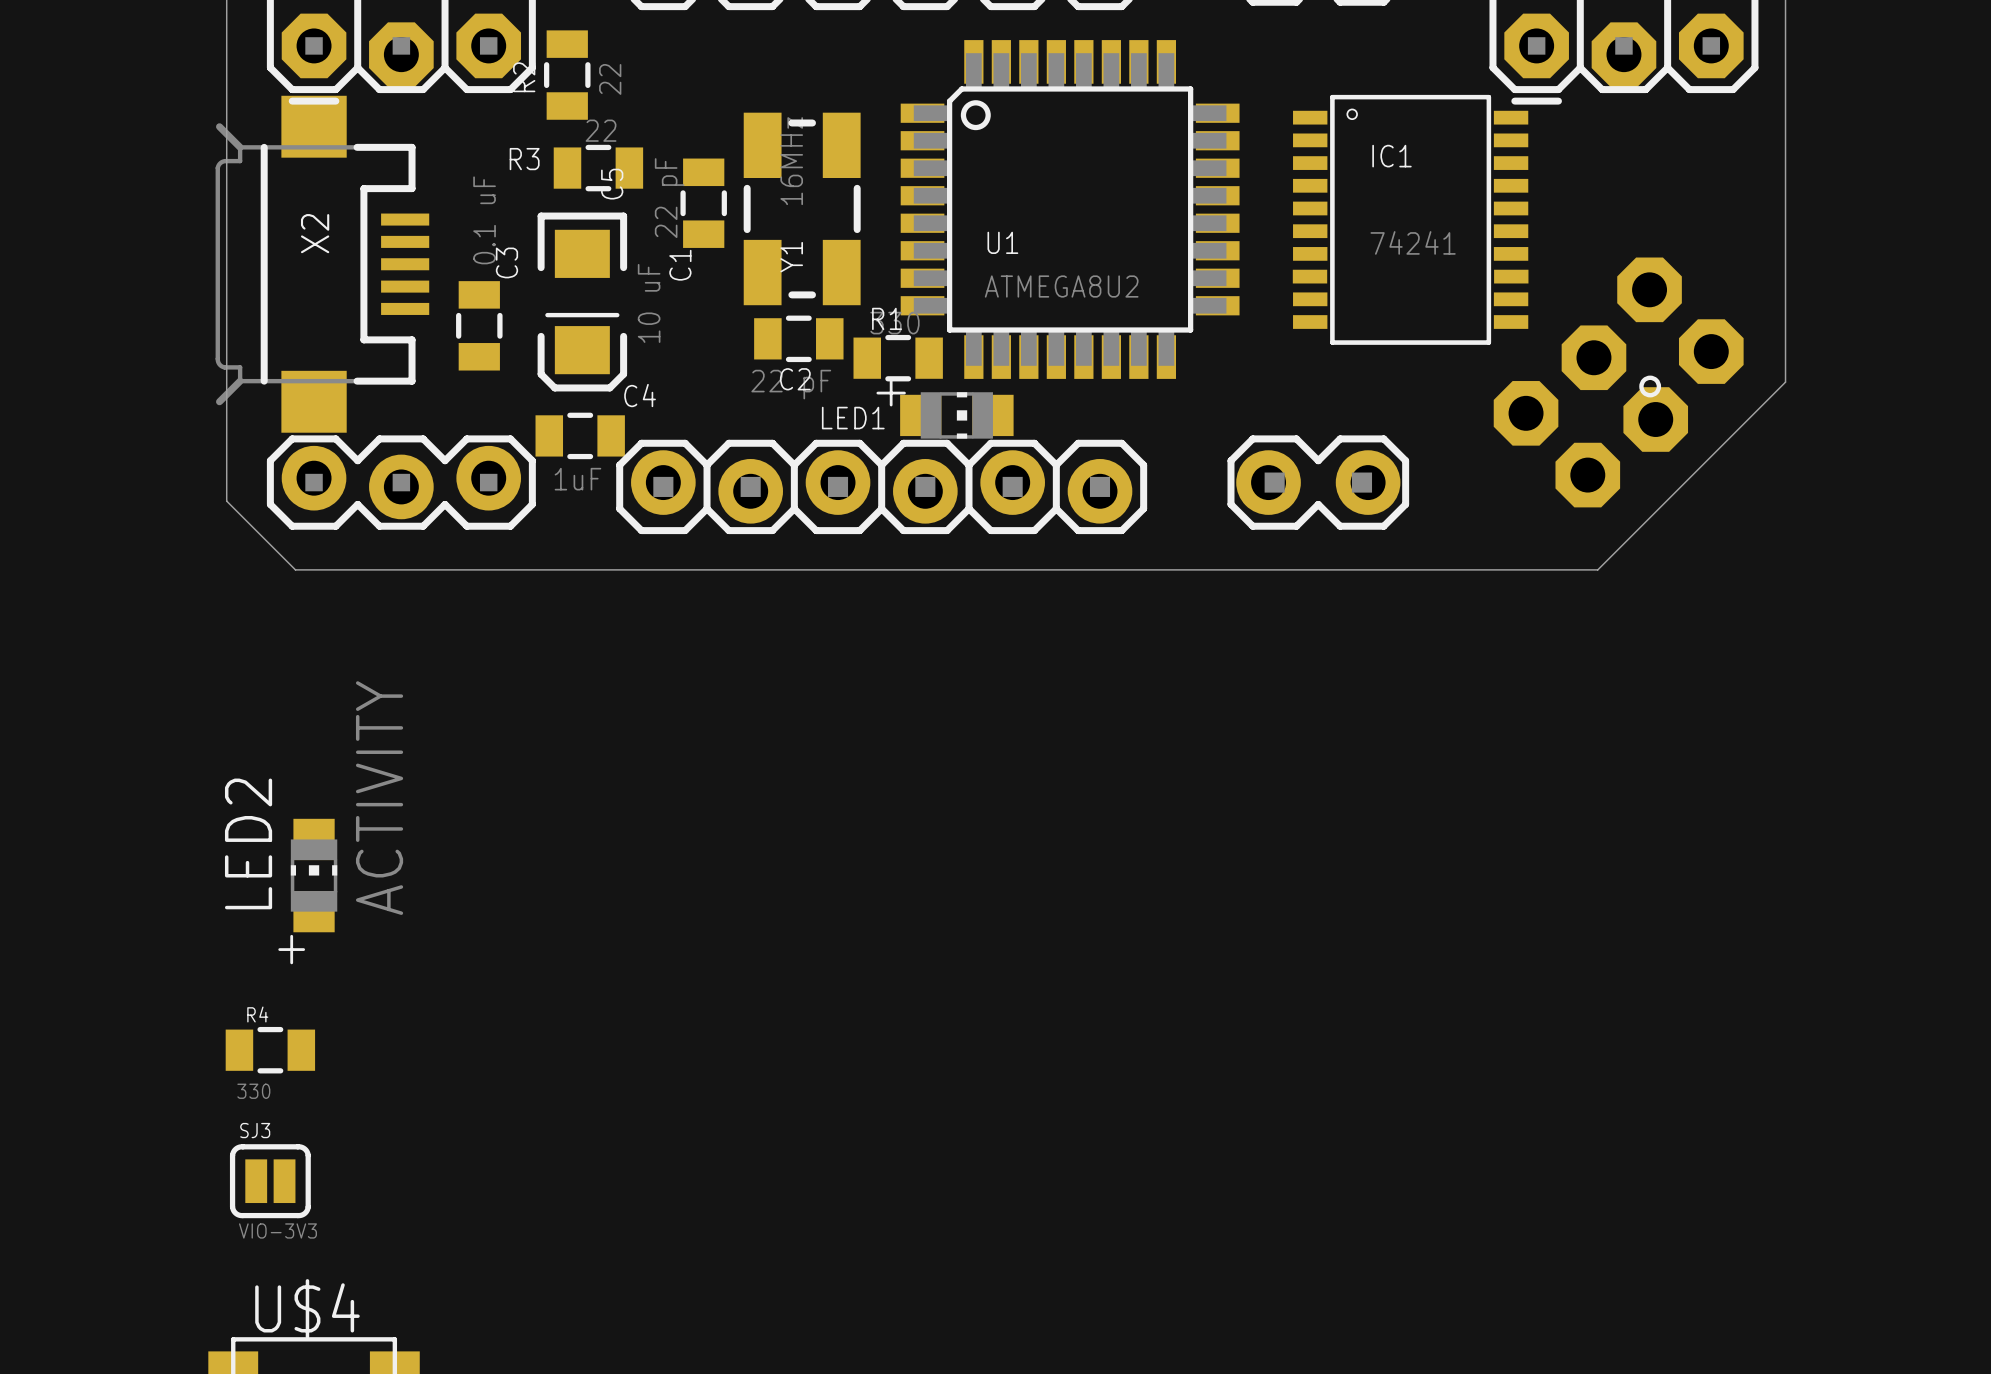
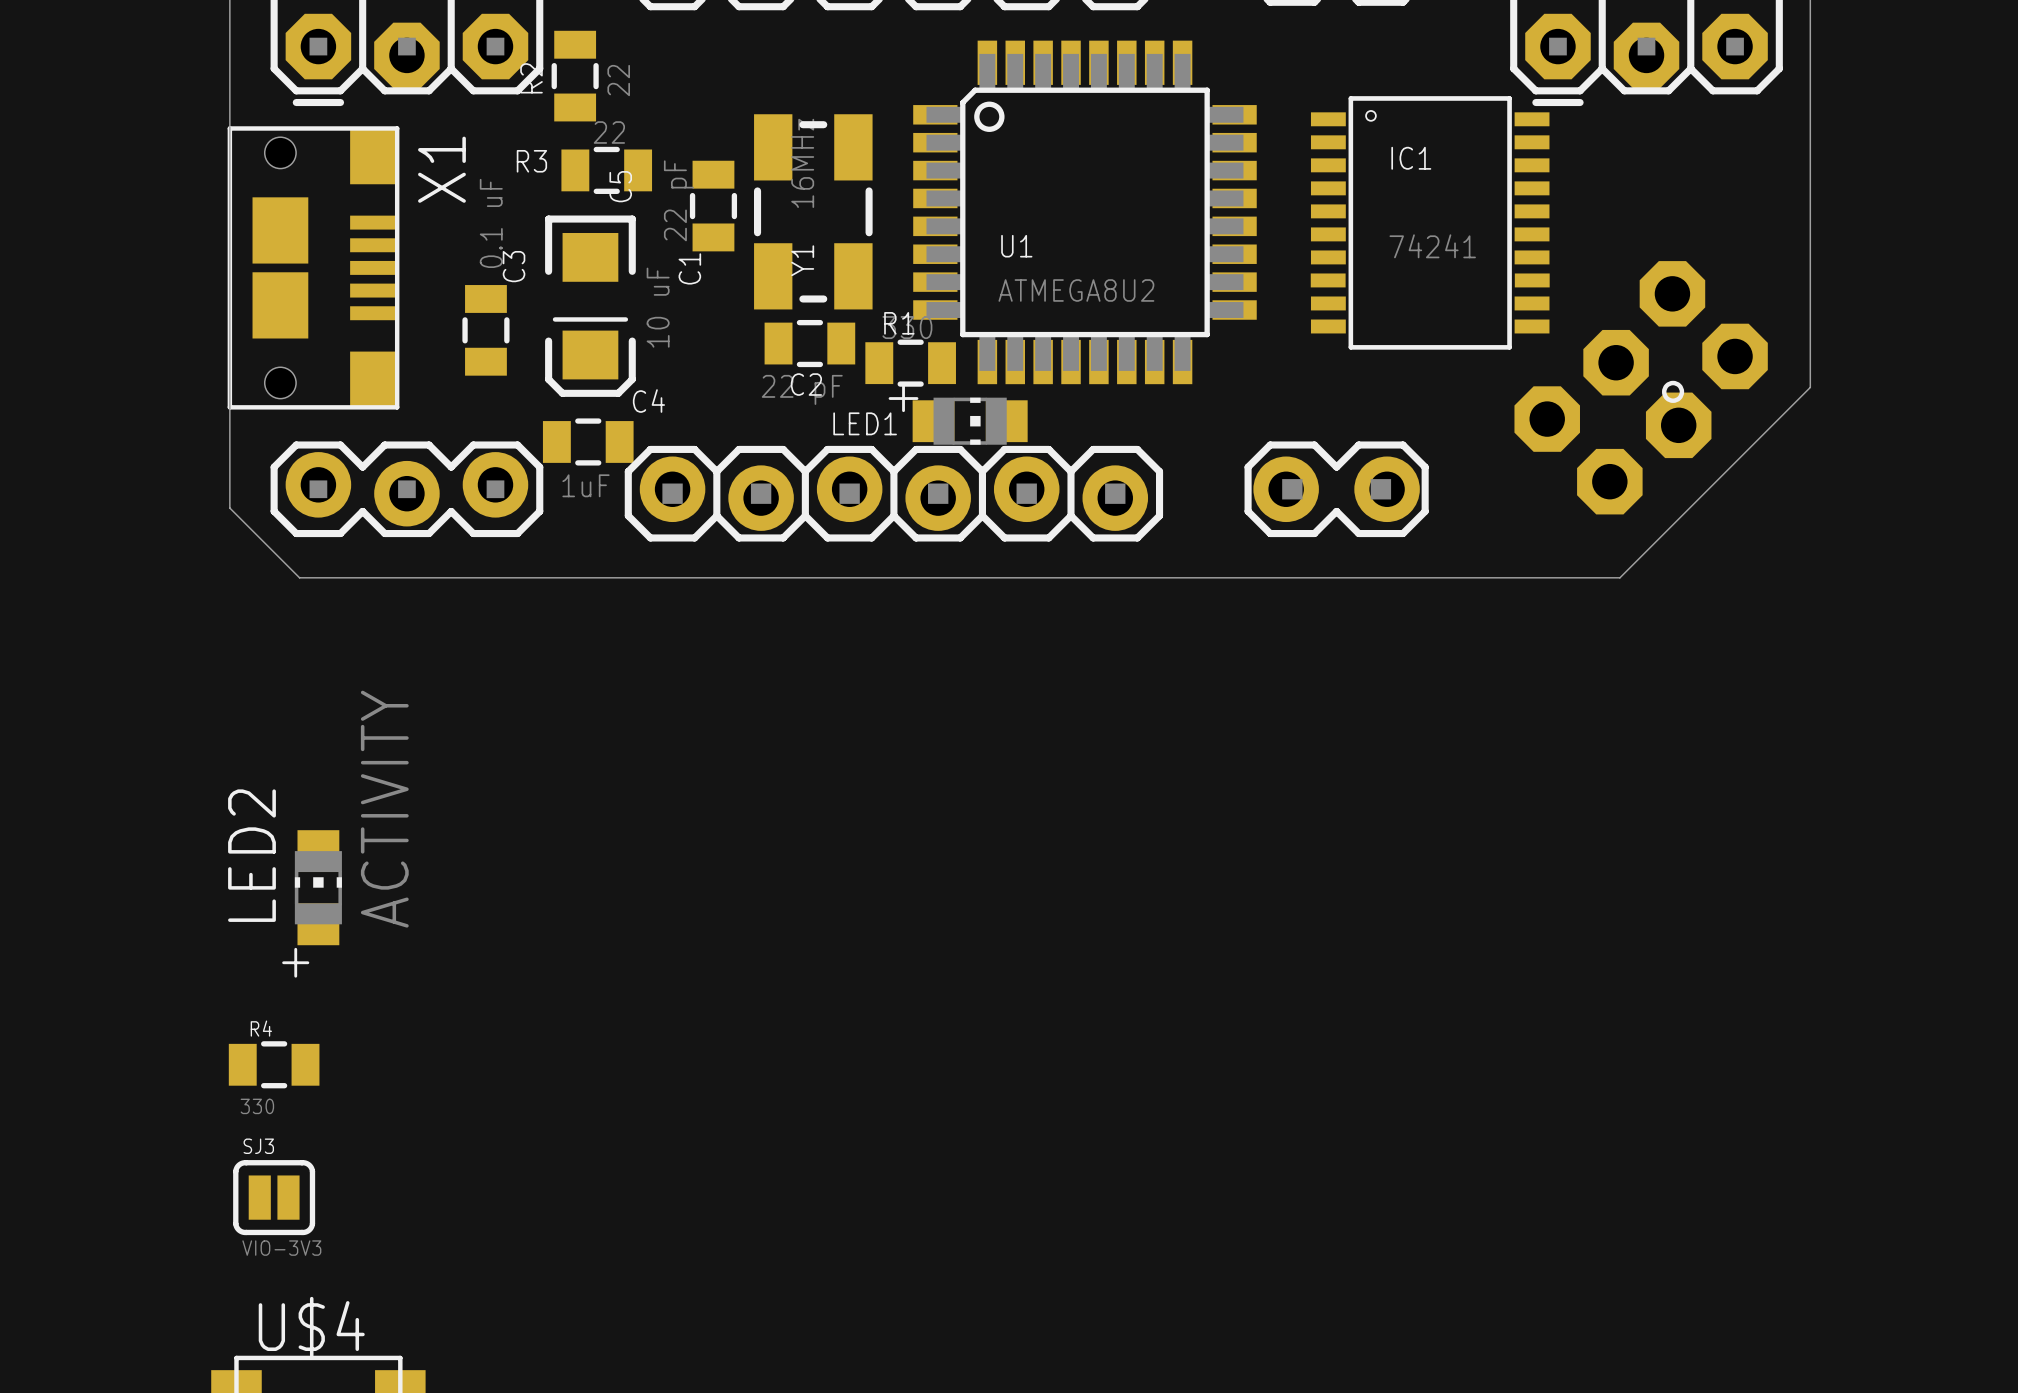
X1: none -> (313, 267)
X2: (322, 264) -> none

